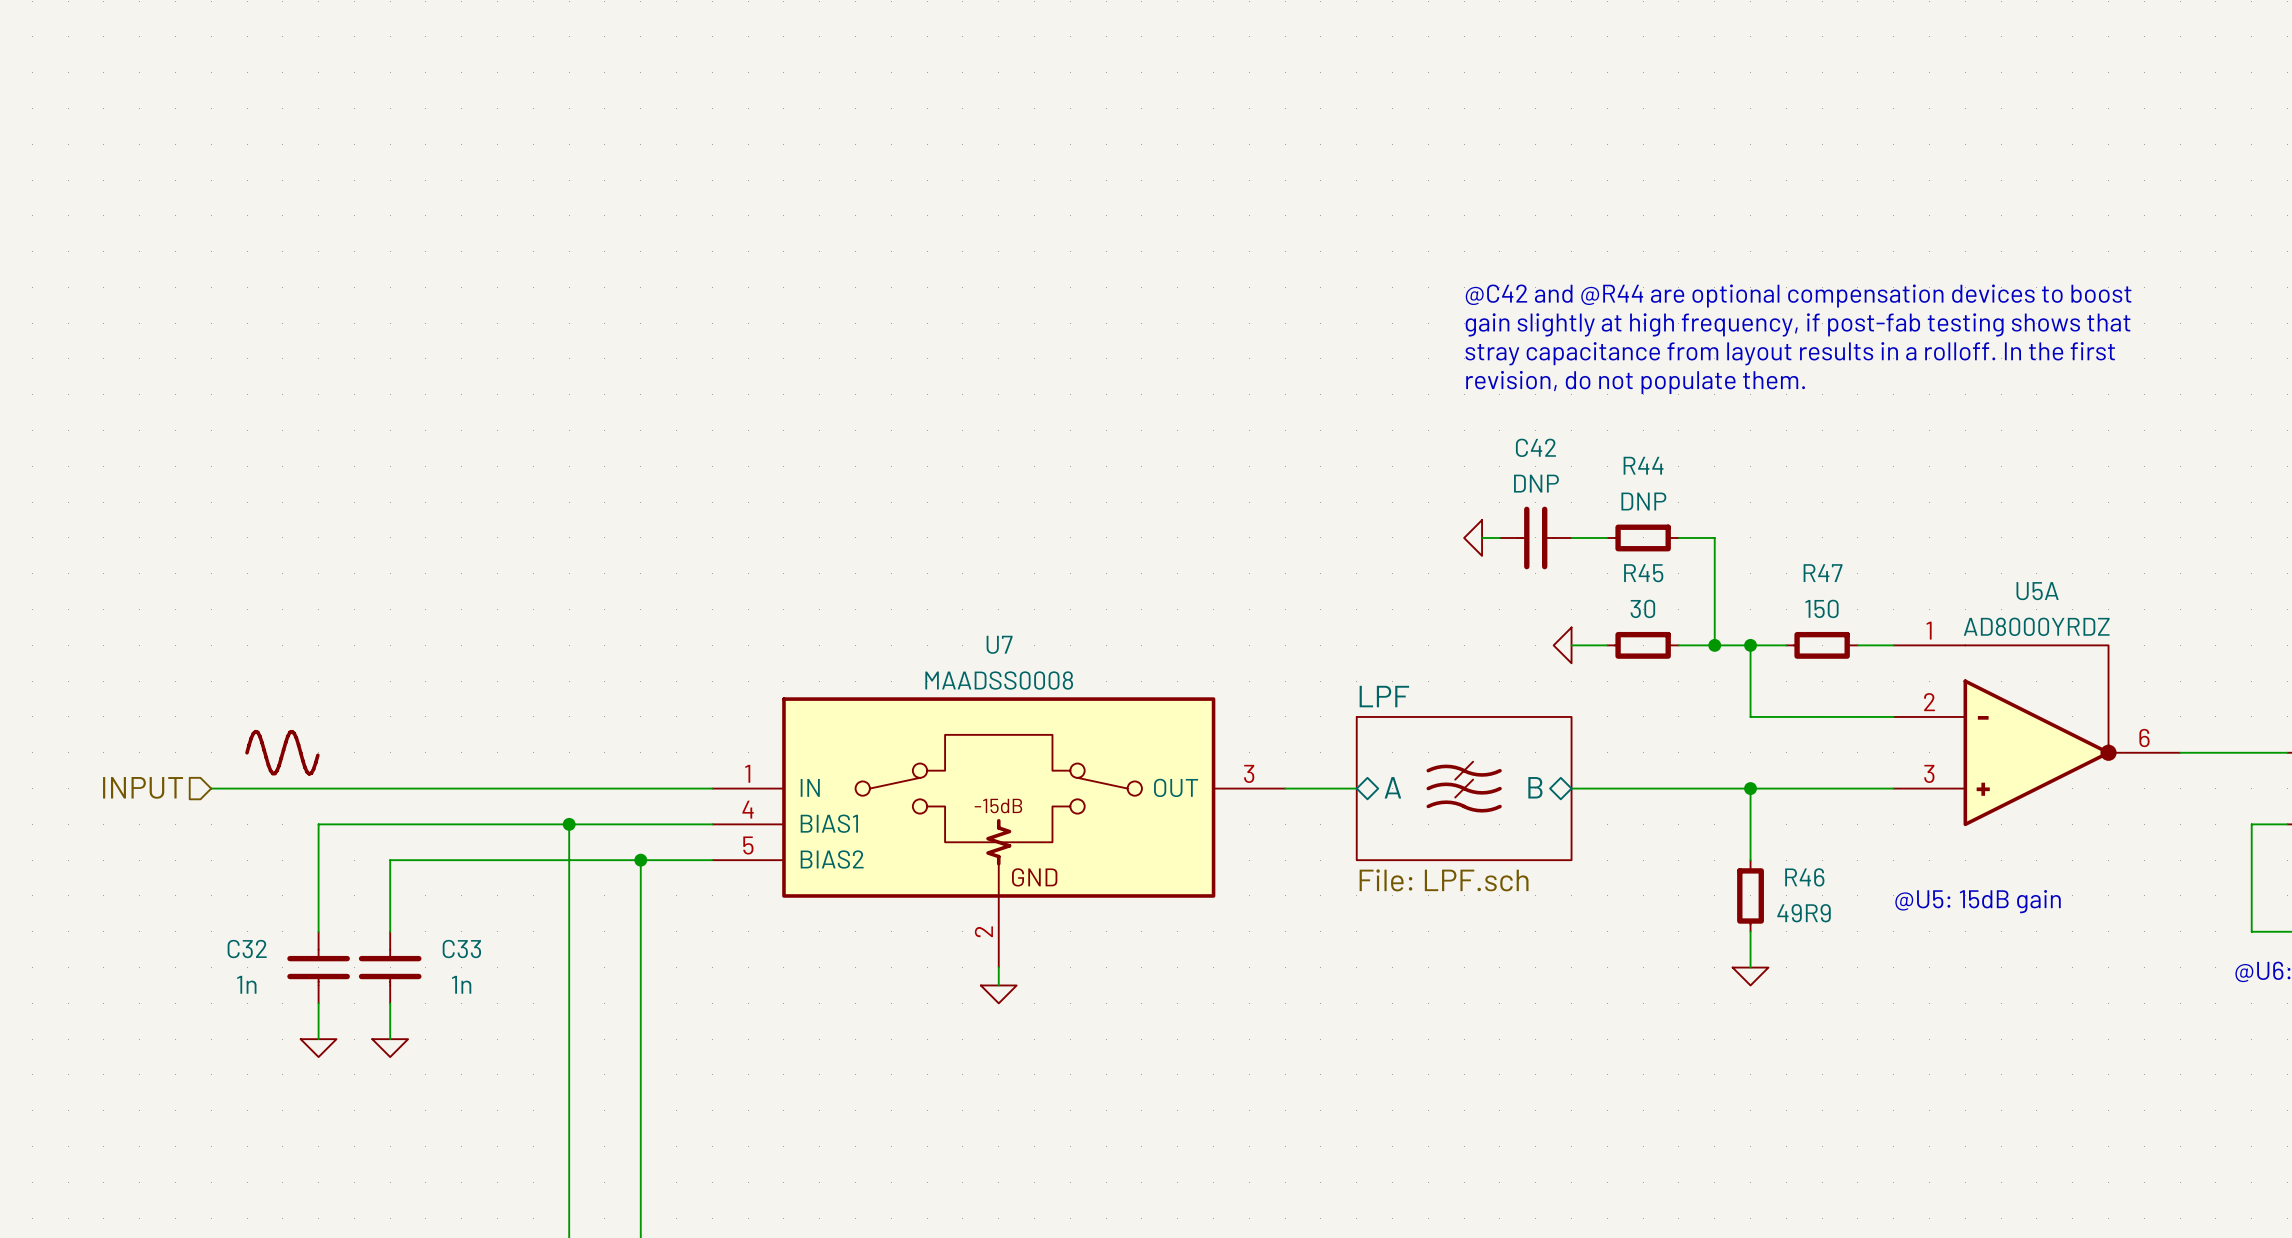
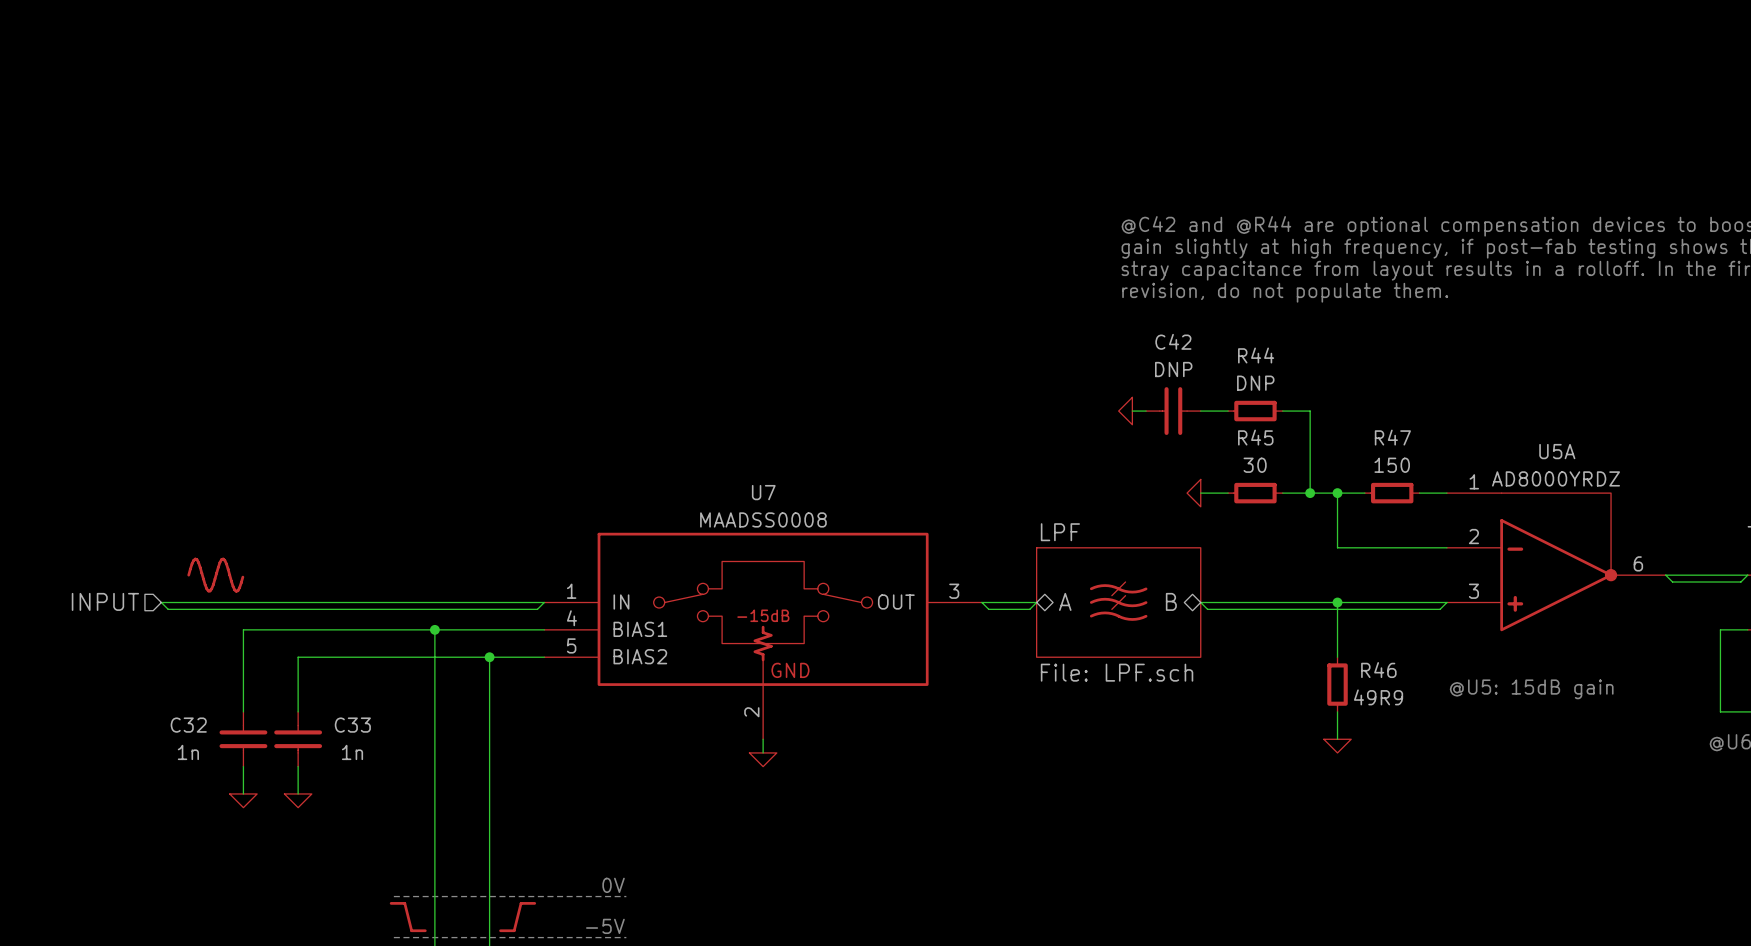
wire: none -> (1665, 575) (1672, 582) (1740, 582) (1747, 575)
wire: none -> (161, 602) (168, 609) (537, 609) (544, 602)
wire: none -> (981, 602) (988, 609) (1029, 609) (1036, 602)
wire: none -> (1200, 602) (1207, 609) (1440, 609) (1446, 602)
text: none -> 0V (613, 885)
line: none -> (393, 896) (626, 896)
power symbol: none -> (408, 917)
power symbol: none -> (517, 917)
text: none -> -5V (605, 926)
line: none -> (393, 937) (626, 937)

